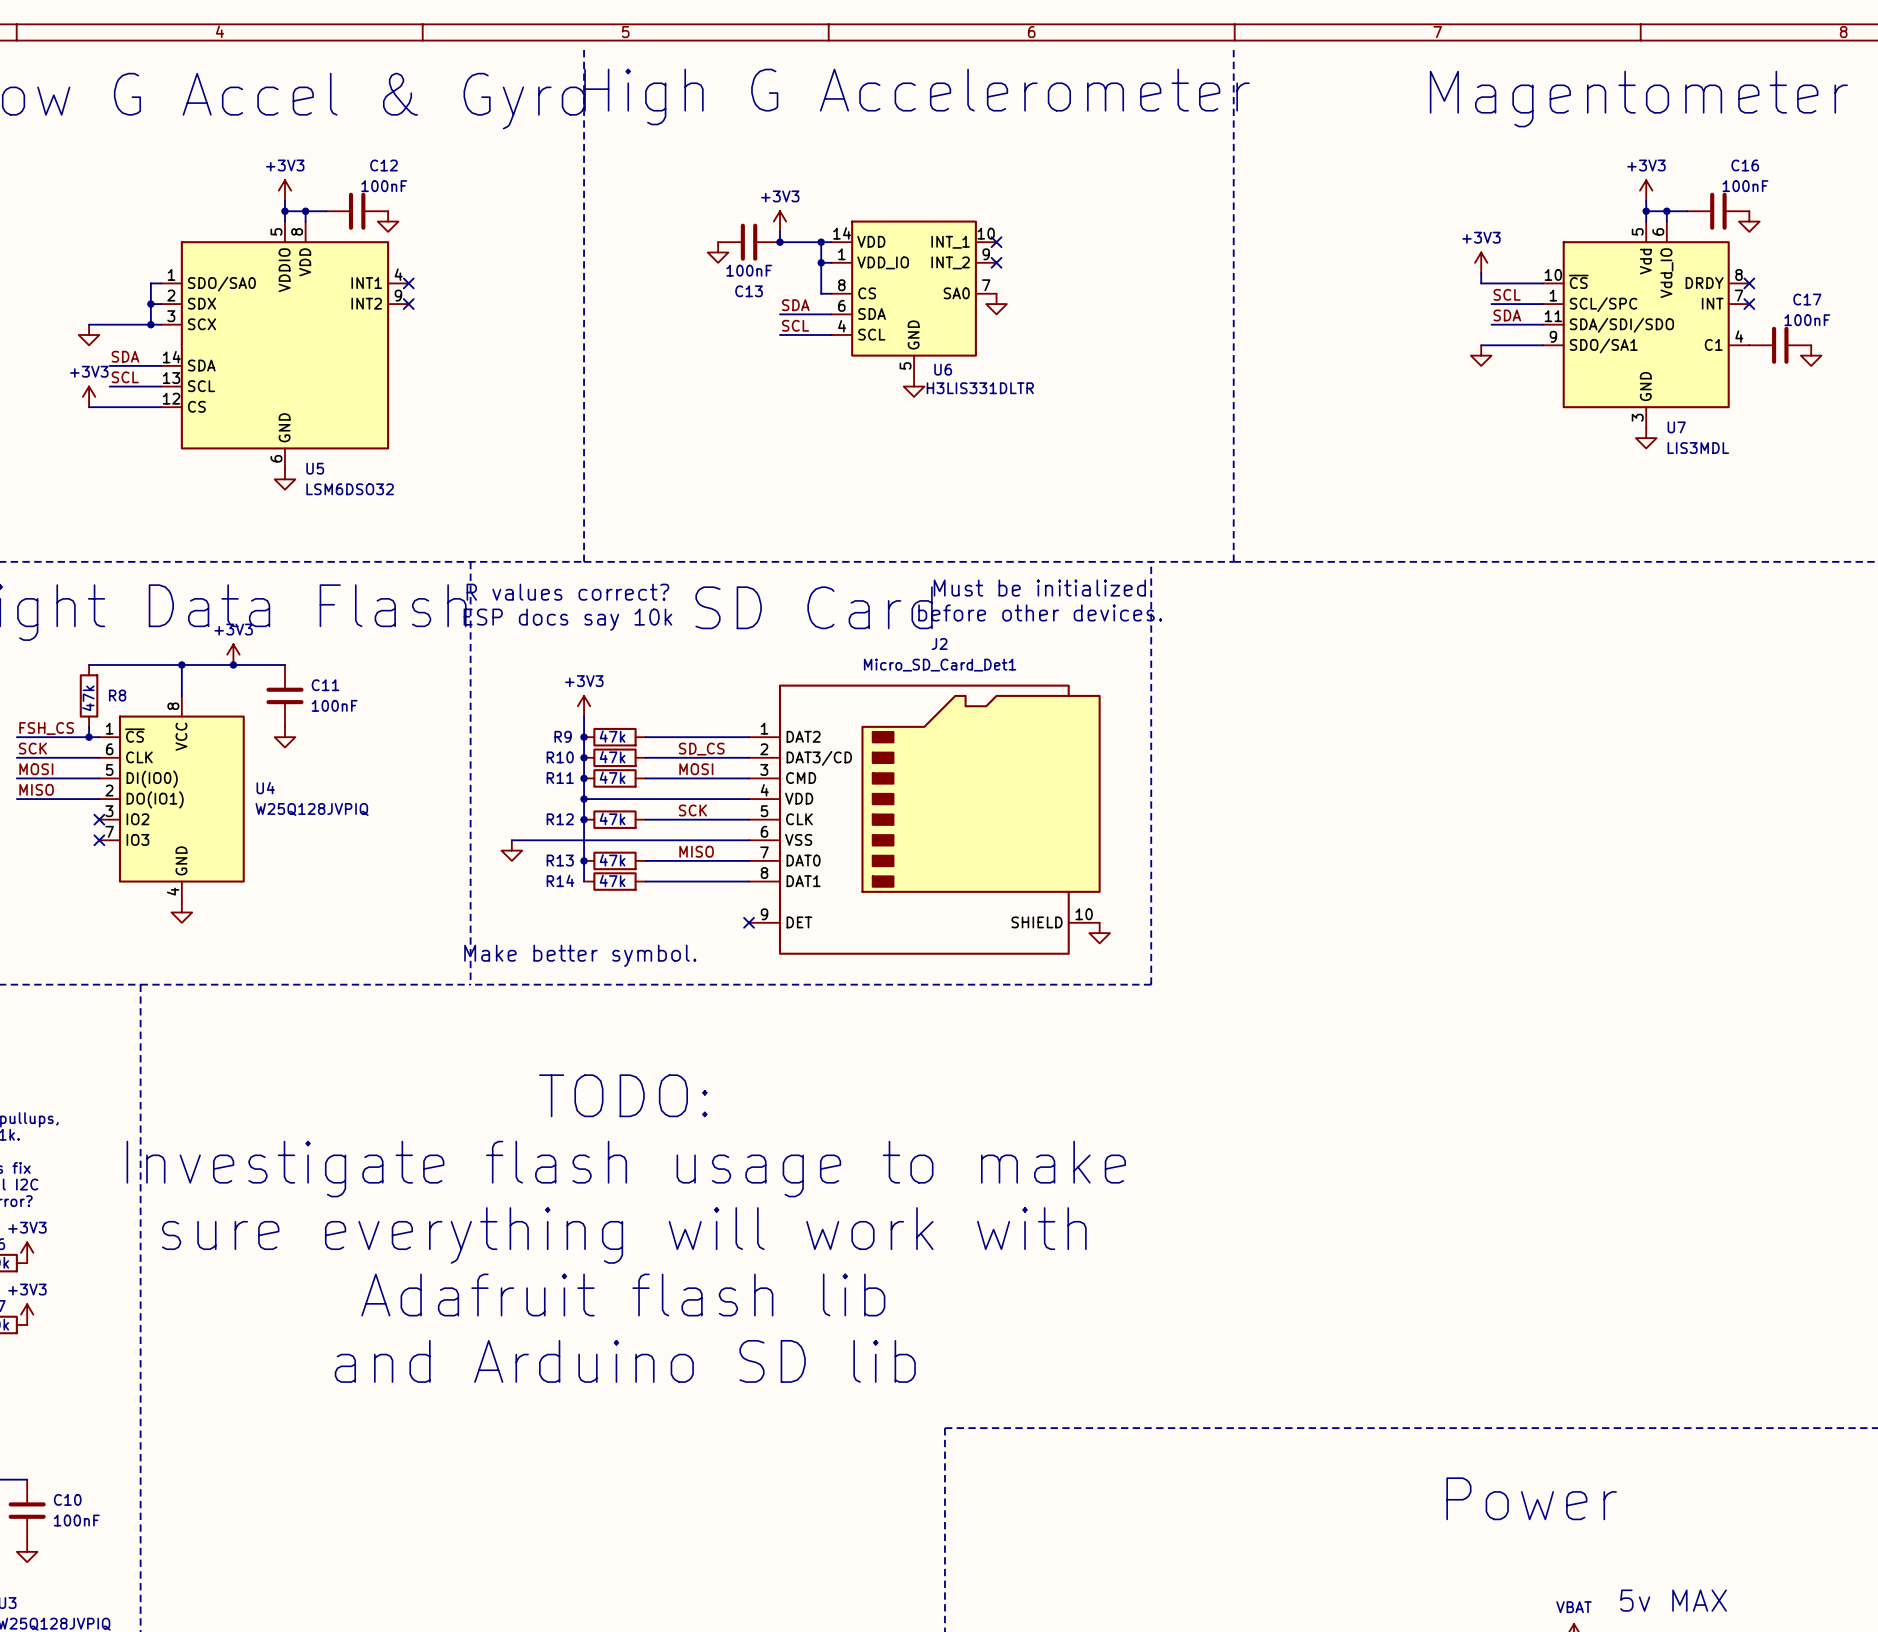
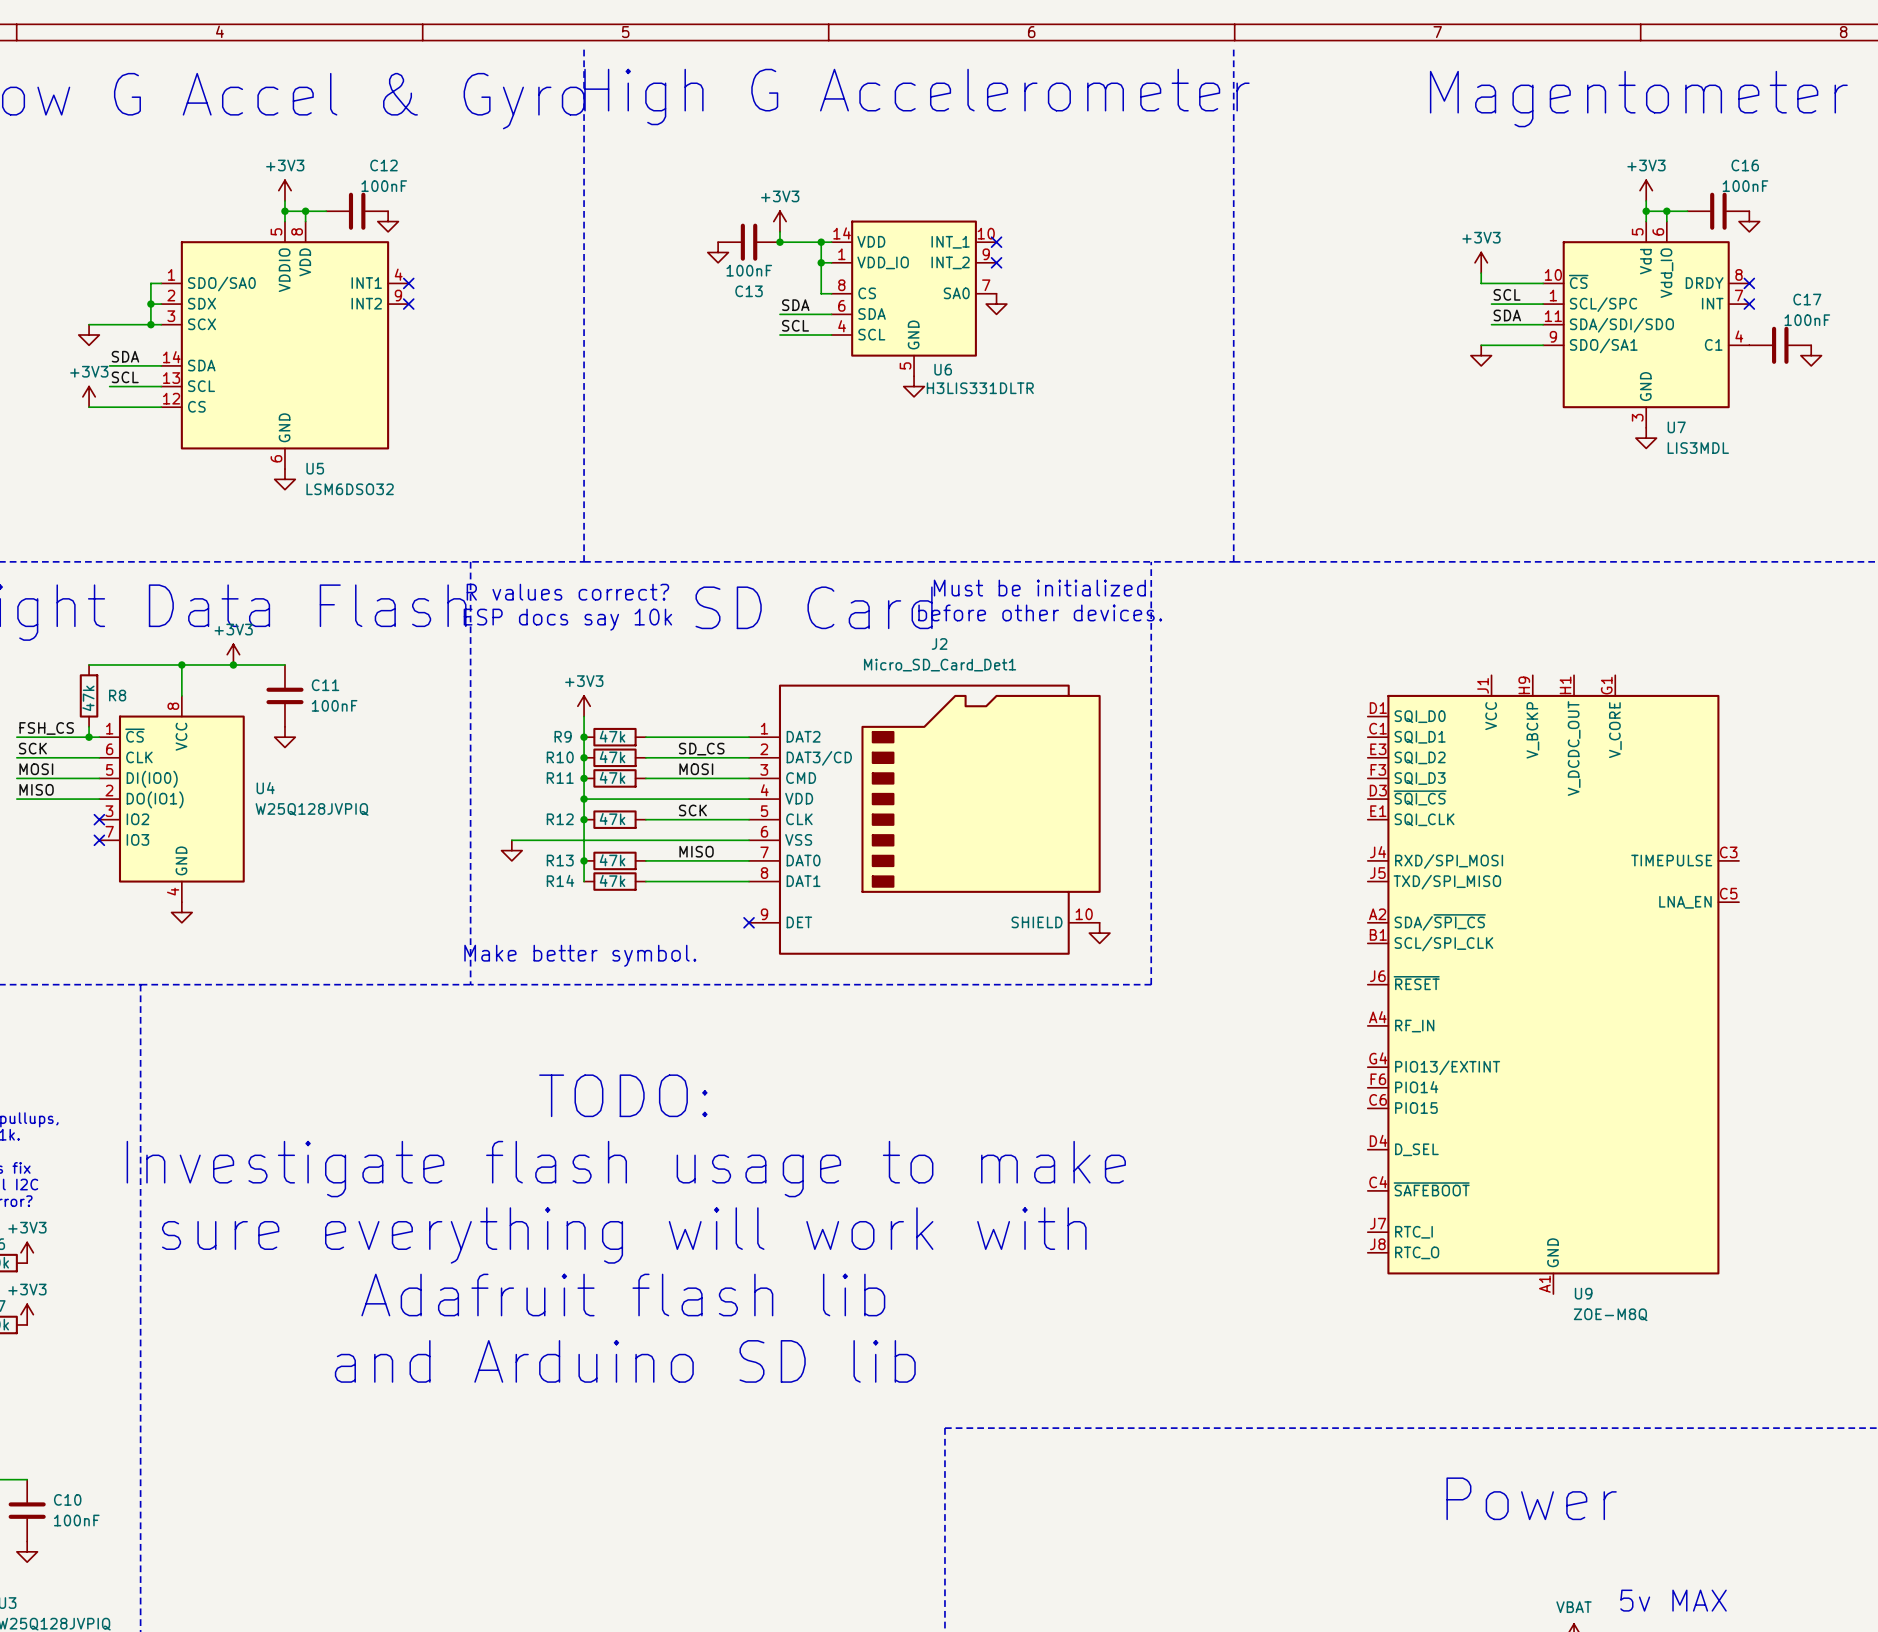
U9: none -> ZOE-M8Q (1553, 984)

